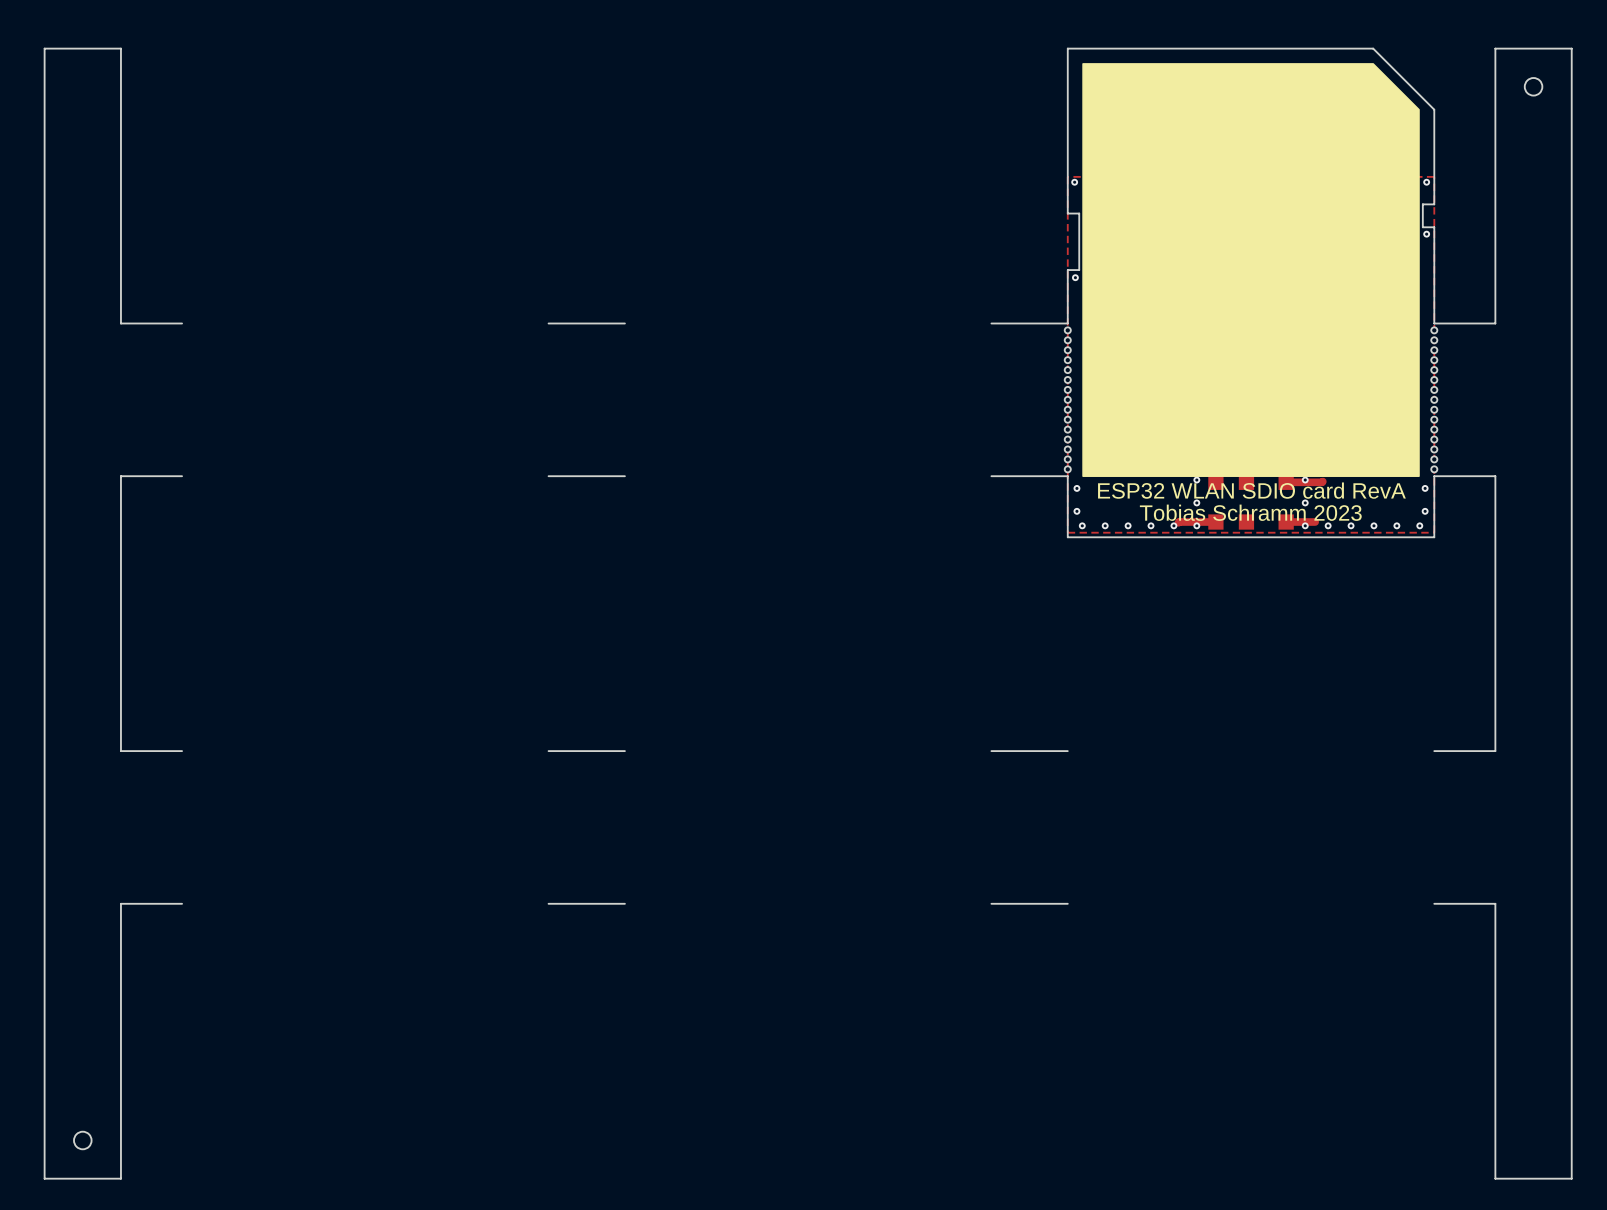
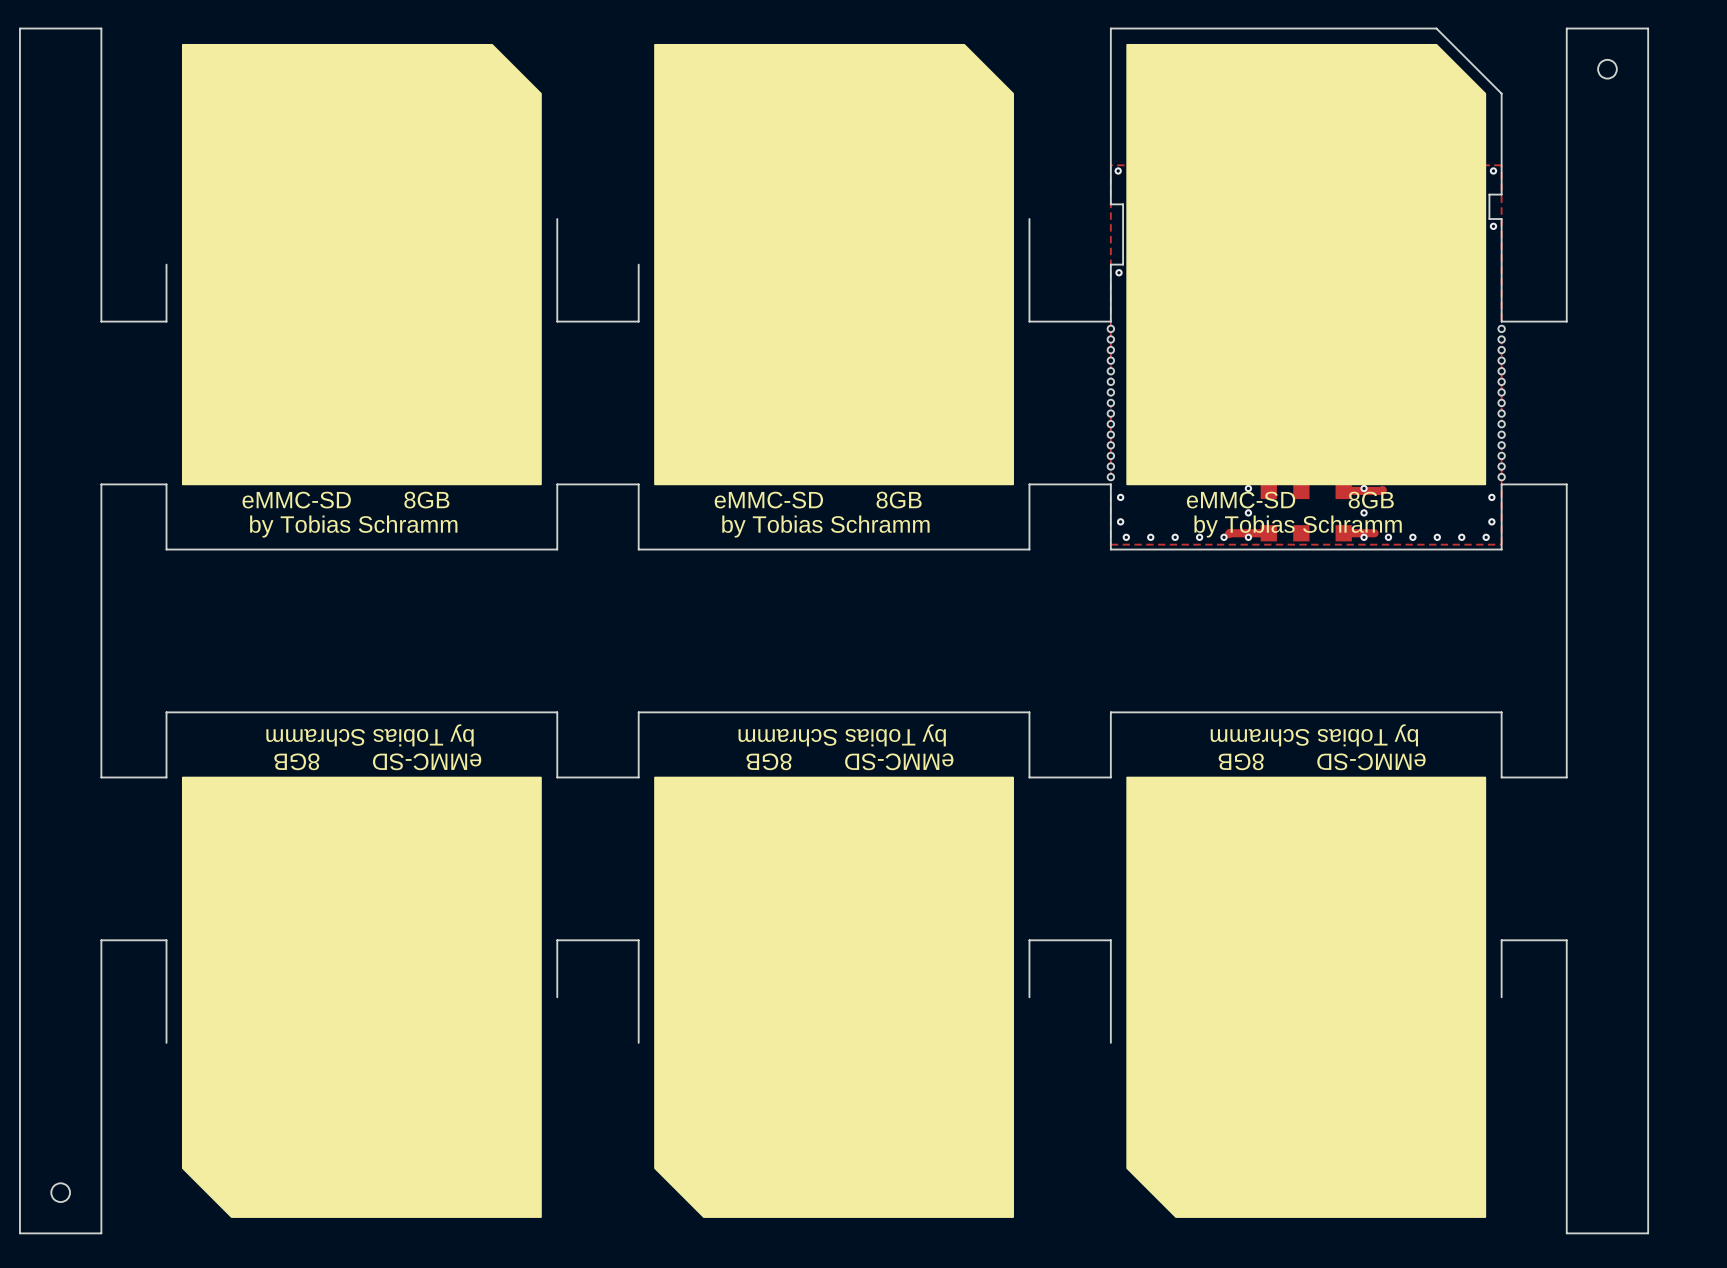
drawing: none -> [181, 43, 542, 486]
drawing: none -> [654, 43, 1014, 486]
board edge: none -> (557, 219) (557, 321)
board edge: none -> (1029, 219) (1029, 321)
board edge: none -> (166, 264) (166, 321)
board edge: none -> (638, 264) (638, 321)
board edge: none -> (557, 484) (557, 549) (166, 549) (166, 484)
board edge: none -> (1029, 484) (1029, 549) (638, 549) (638, 484)
text: none -> eMMC-SD (296, 500)
text: none -> 8GB (426, 500)
text: none -> eMMC-SD (768, 500)
text: none -> 8GB (899, 500)
text: none -> eMMC-SD (1241, 500)
text: ESP32 WLAN SDIO card RevA (1251, 490) -> none
text: none -> 8GB (1371, 500)
text: Tobias Schramm 2023 (1250, 512) -> by Tobias Schramm (1298, 526)
text: none -> by Tobias Schramm (353, 526)
text: none -> by Tobias Schramm (825, 526)
text: none -> by Tobias Schramm (370, 735)
text: none -> by Tobias Schramm (842, 735)
text: none -> by Tobias Schramm (1314, 735)
text: none -> 8GB (296, 761)
text: none -> eMMC-SD (427, 761)
text: none -> 8GB (769, 761)
text: none -> eMMC-SD (899, 761)
text: none -> 8GB (1241, 761)
text: none -> eMMC-SD (1371, 761)
drawing: none -> [181, 776, 542, 1218]
drawing: none -> [654, 776, 1014, 1218]
drawing: none -> [1126, 776, 1487, 1218]
board edge: none -> (557, 777) (557, 712) (166, 712) (166, 777)
board edge: none -> (1029, 777) (1029, 712) (638, 712) (638, 777)
board edge: none -> (1501, 777) (1501, 712) (1110, 712) (1110, 777)
board edge: none -> (166, 940) (166, 1042)
board edge: none -> (557, 940) (557, 997)
board edge: none -> (638, 940) (638, 1042)
board edge: none -> (1029, 940) (1029, 997)
board edge: none -> (1110, 940) (1110, 1042)
board edge: none -> (1501, 940) (1501, 997)

